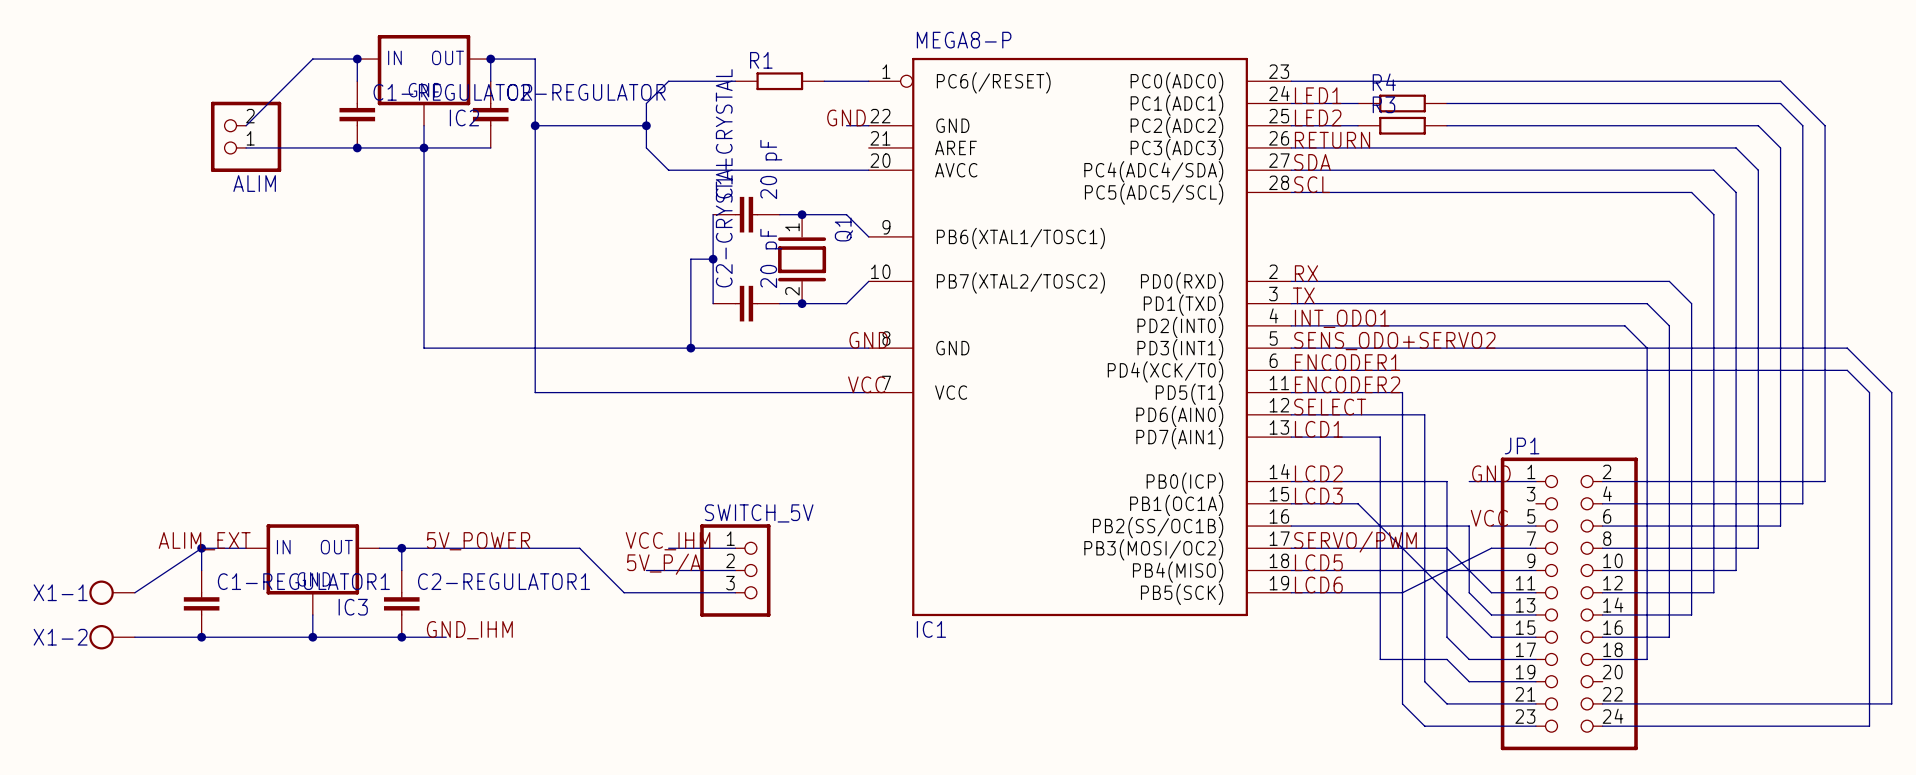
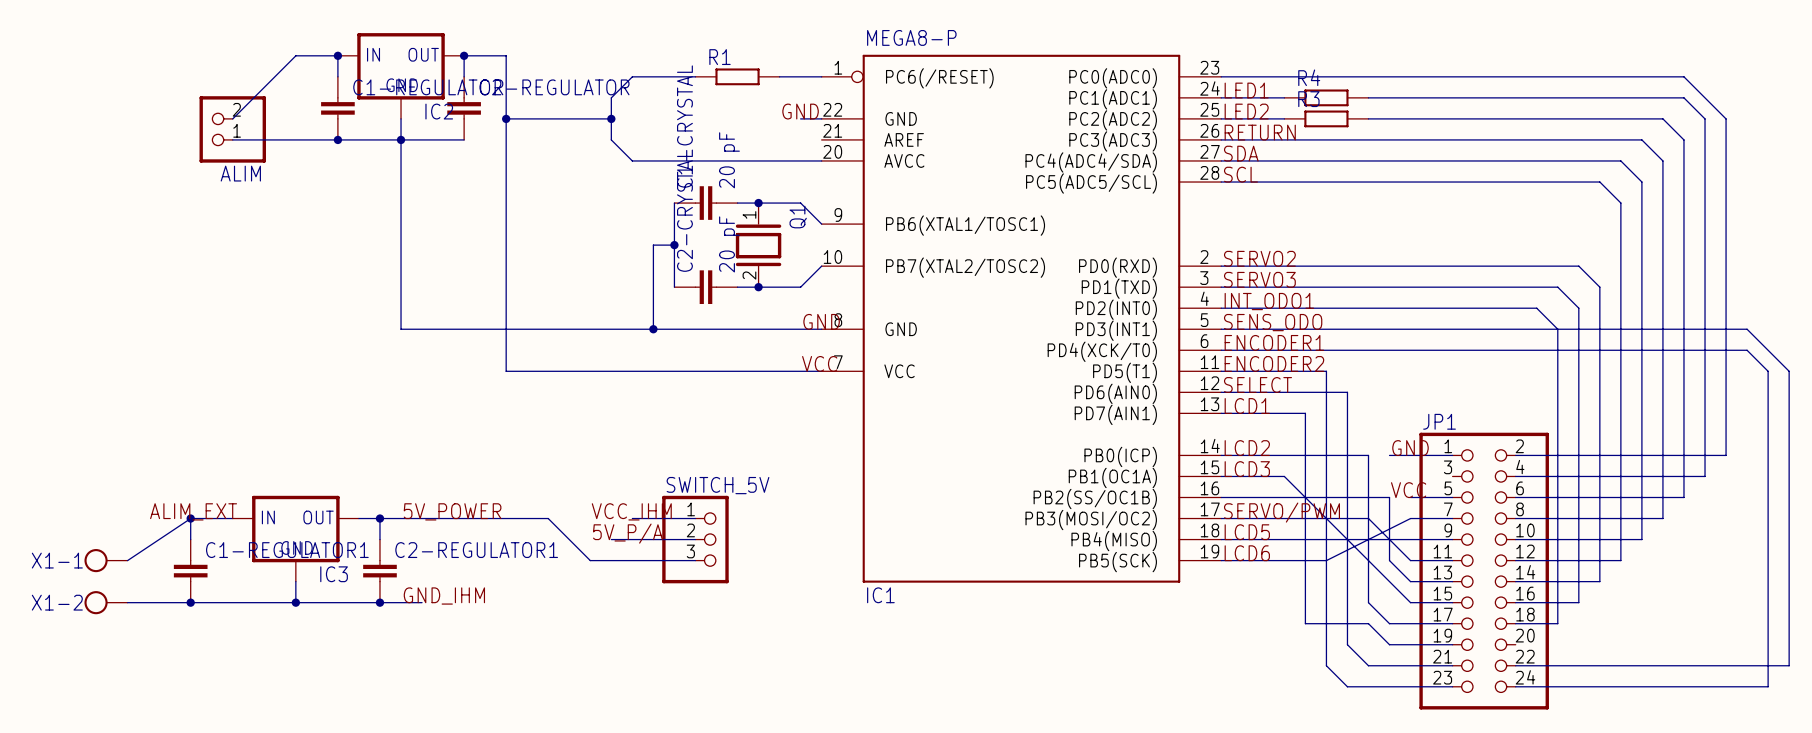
label: RX (1306, 273) -> SERVO2 (1259, 258)
label: TX (1303, 295) -> SERVO3 (1259, 279)
label: SENS_ODO+SERVO2 (1394, 341) -> SENS_ODO (1273, 322)

